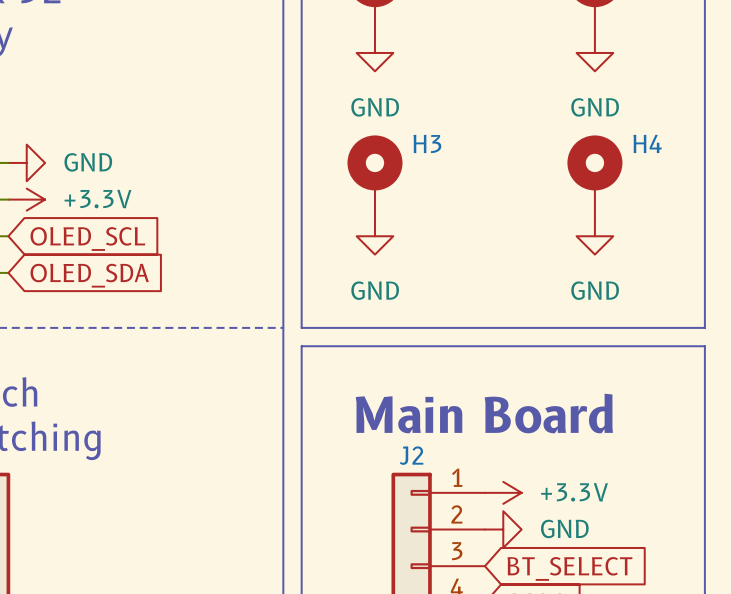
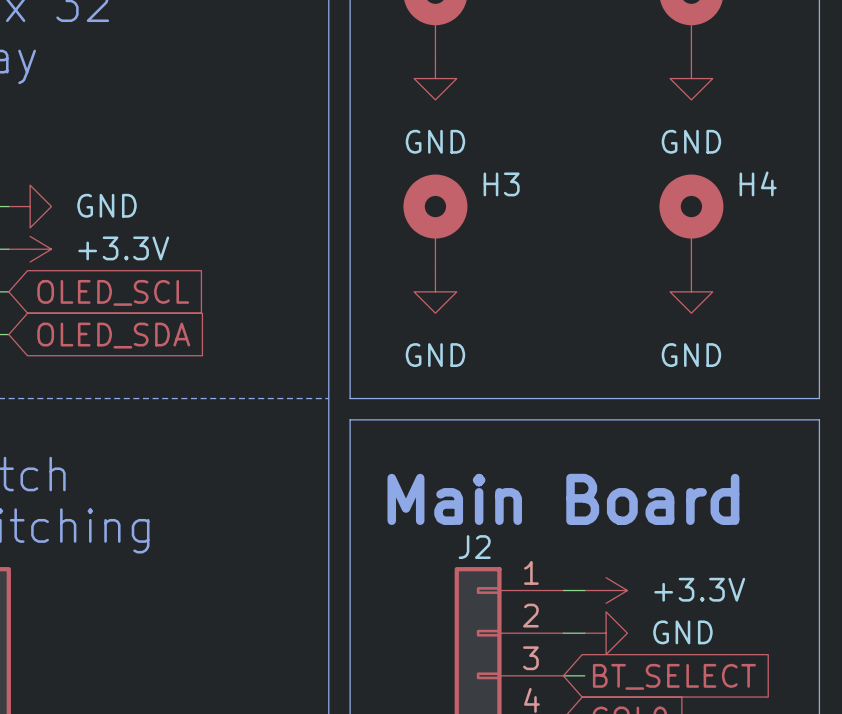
power symbol position: +3.3V (503, 492) -> +3.3V (606, 590)
power symbol position: GND (503, 529) -> GND (606, 633)
wire: none -> (563, 675) (584, 675)

